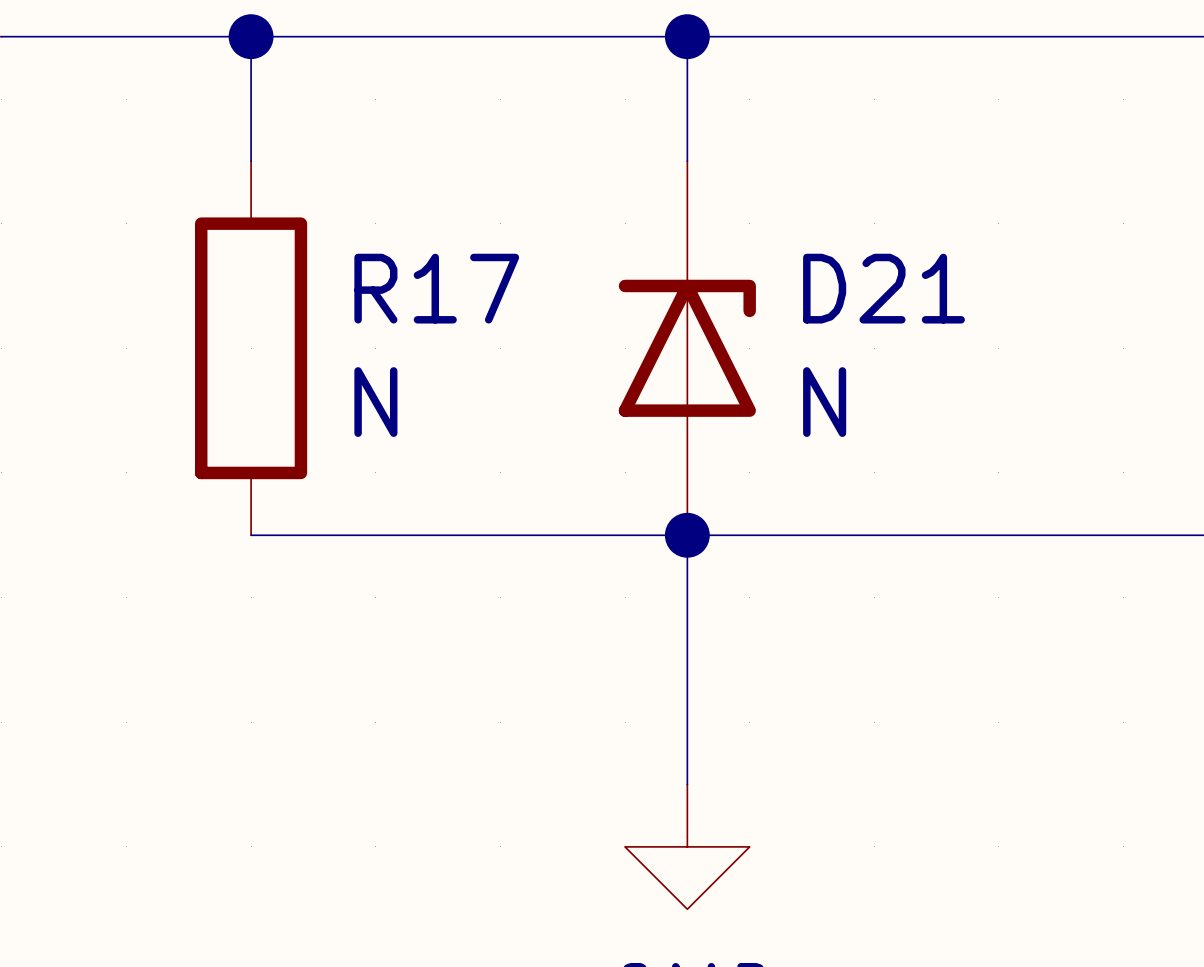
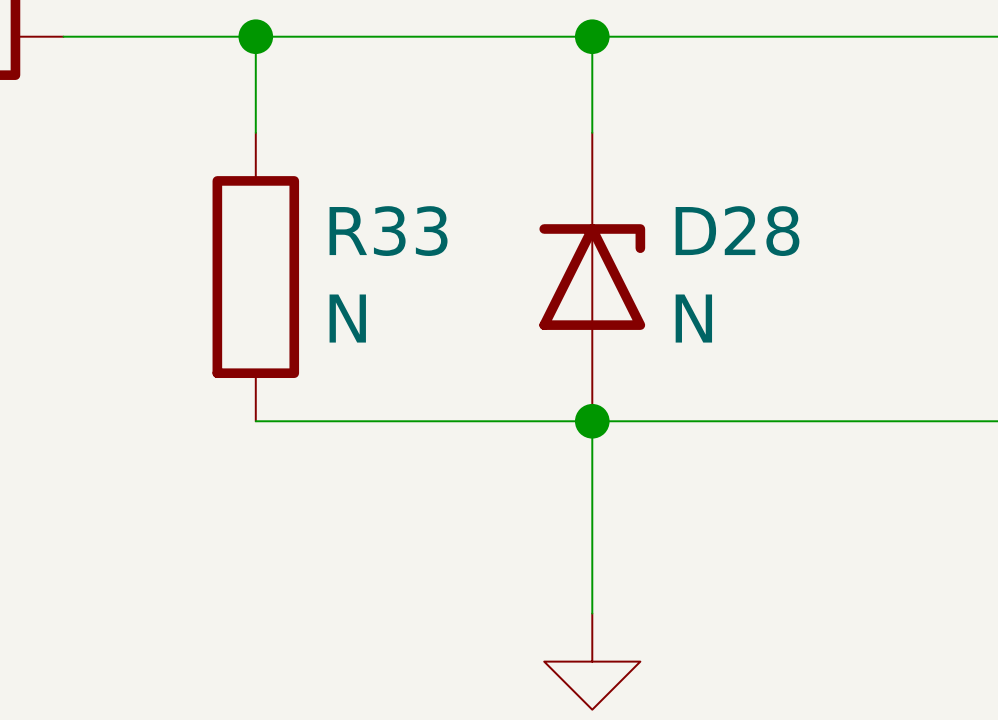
R17 name: R17 (436, 288) -> R33 (388, 231)
D21 name: D21 (884, 288) -> D28 (737, 231)

